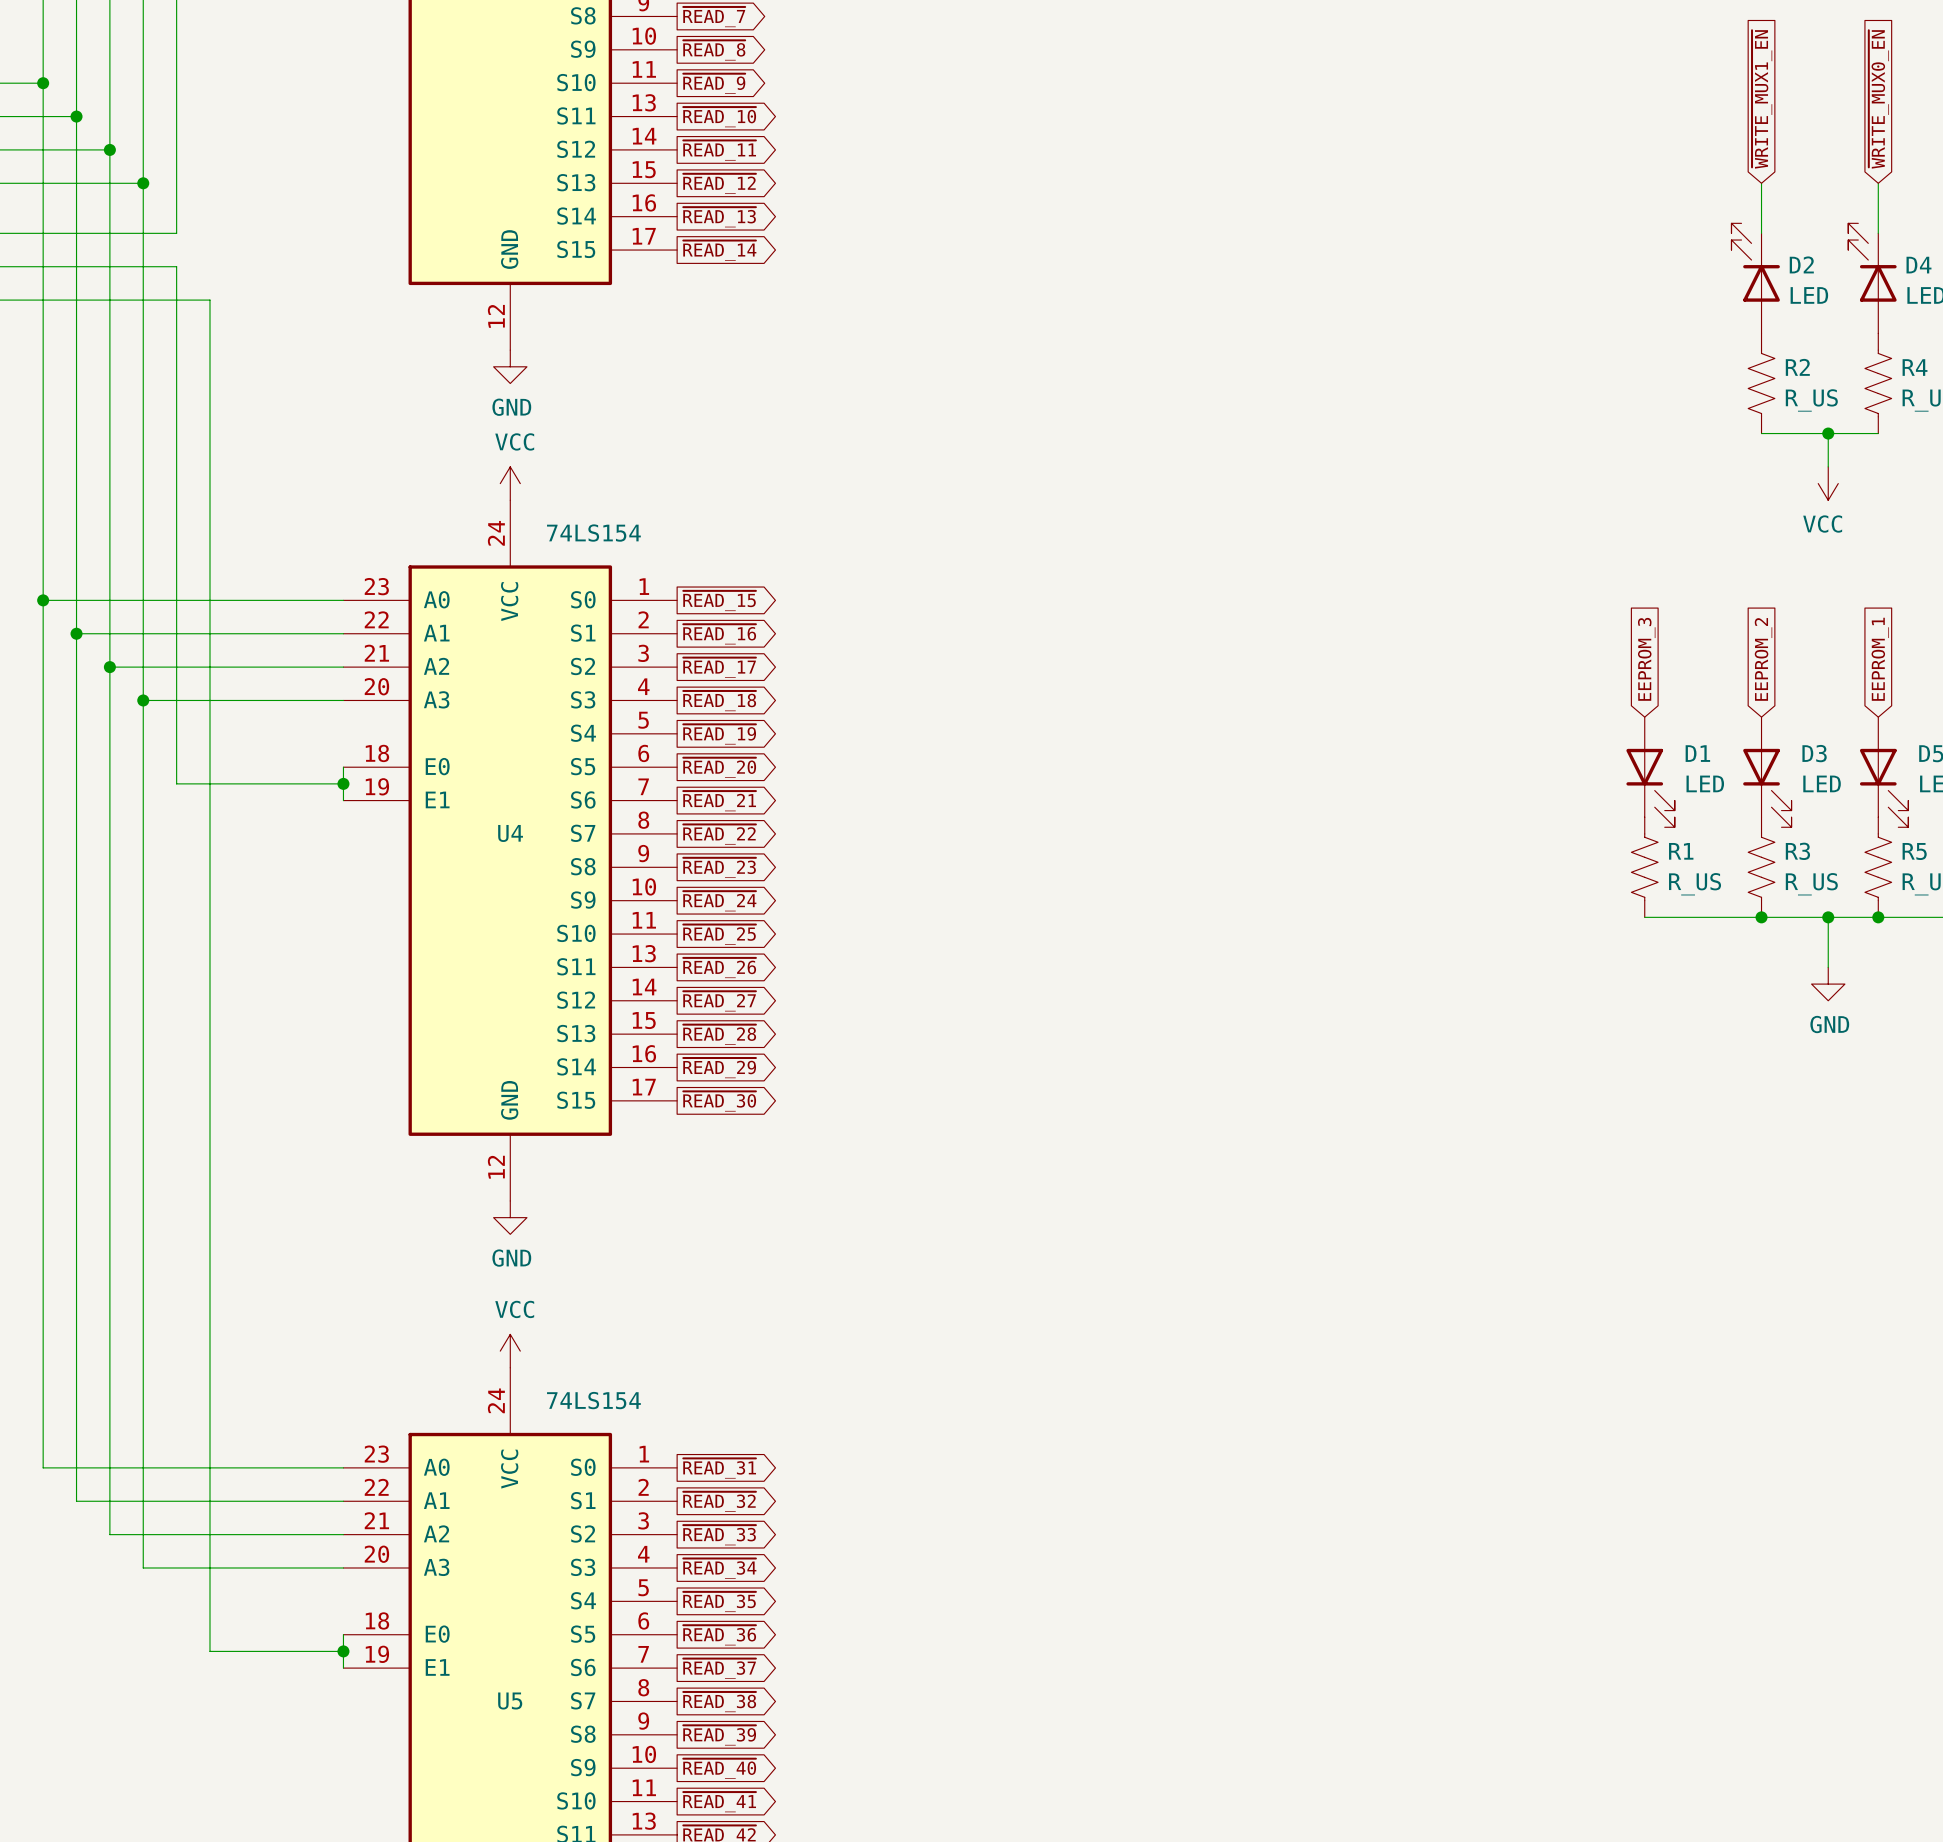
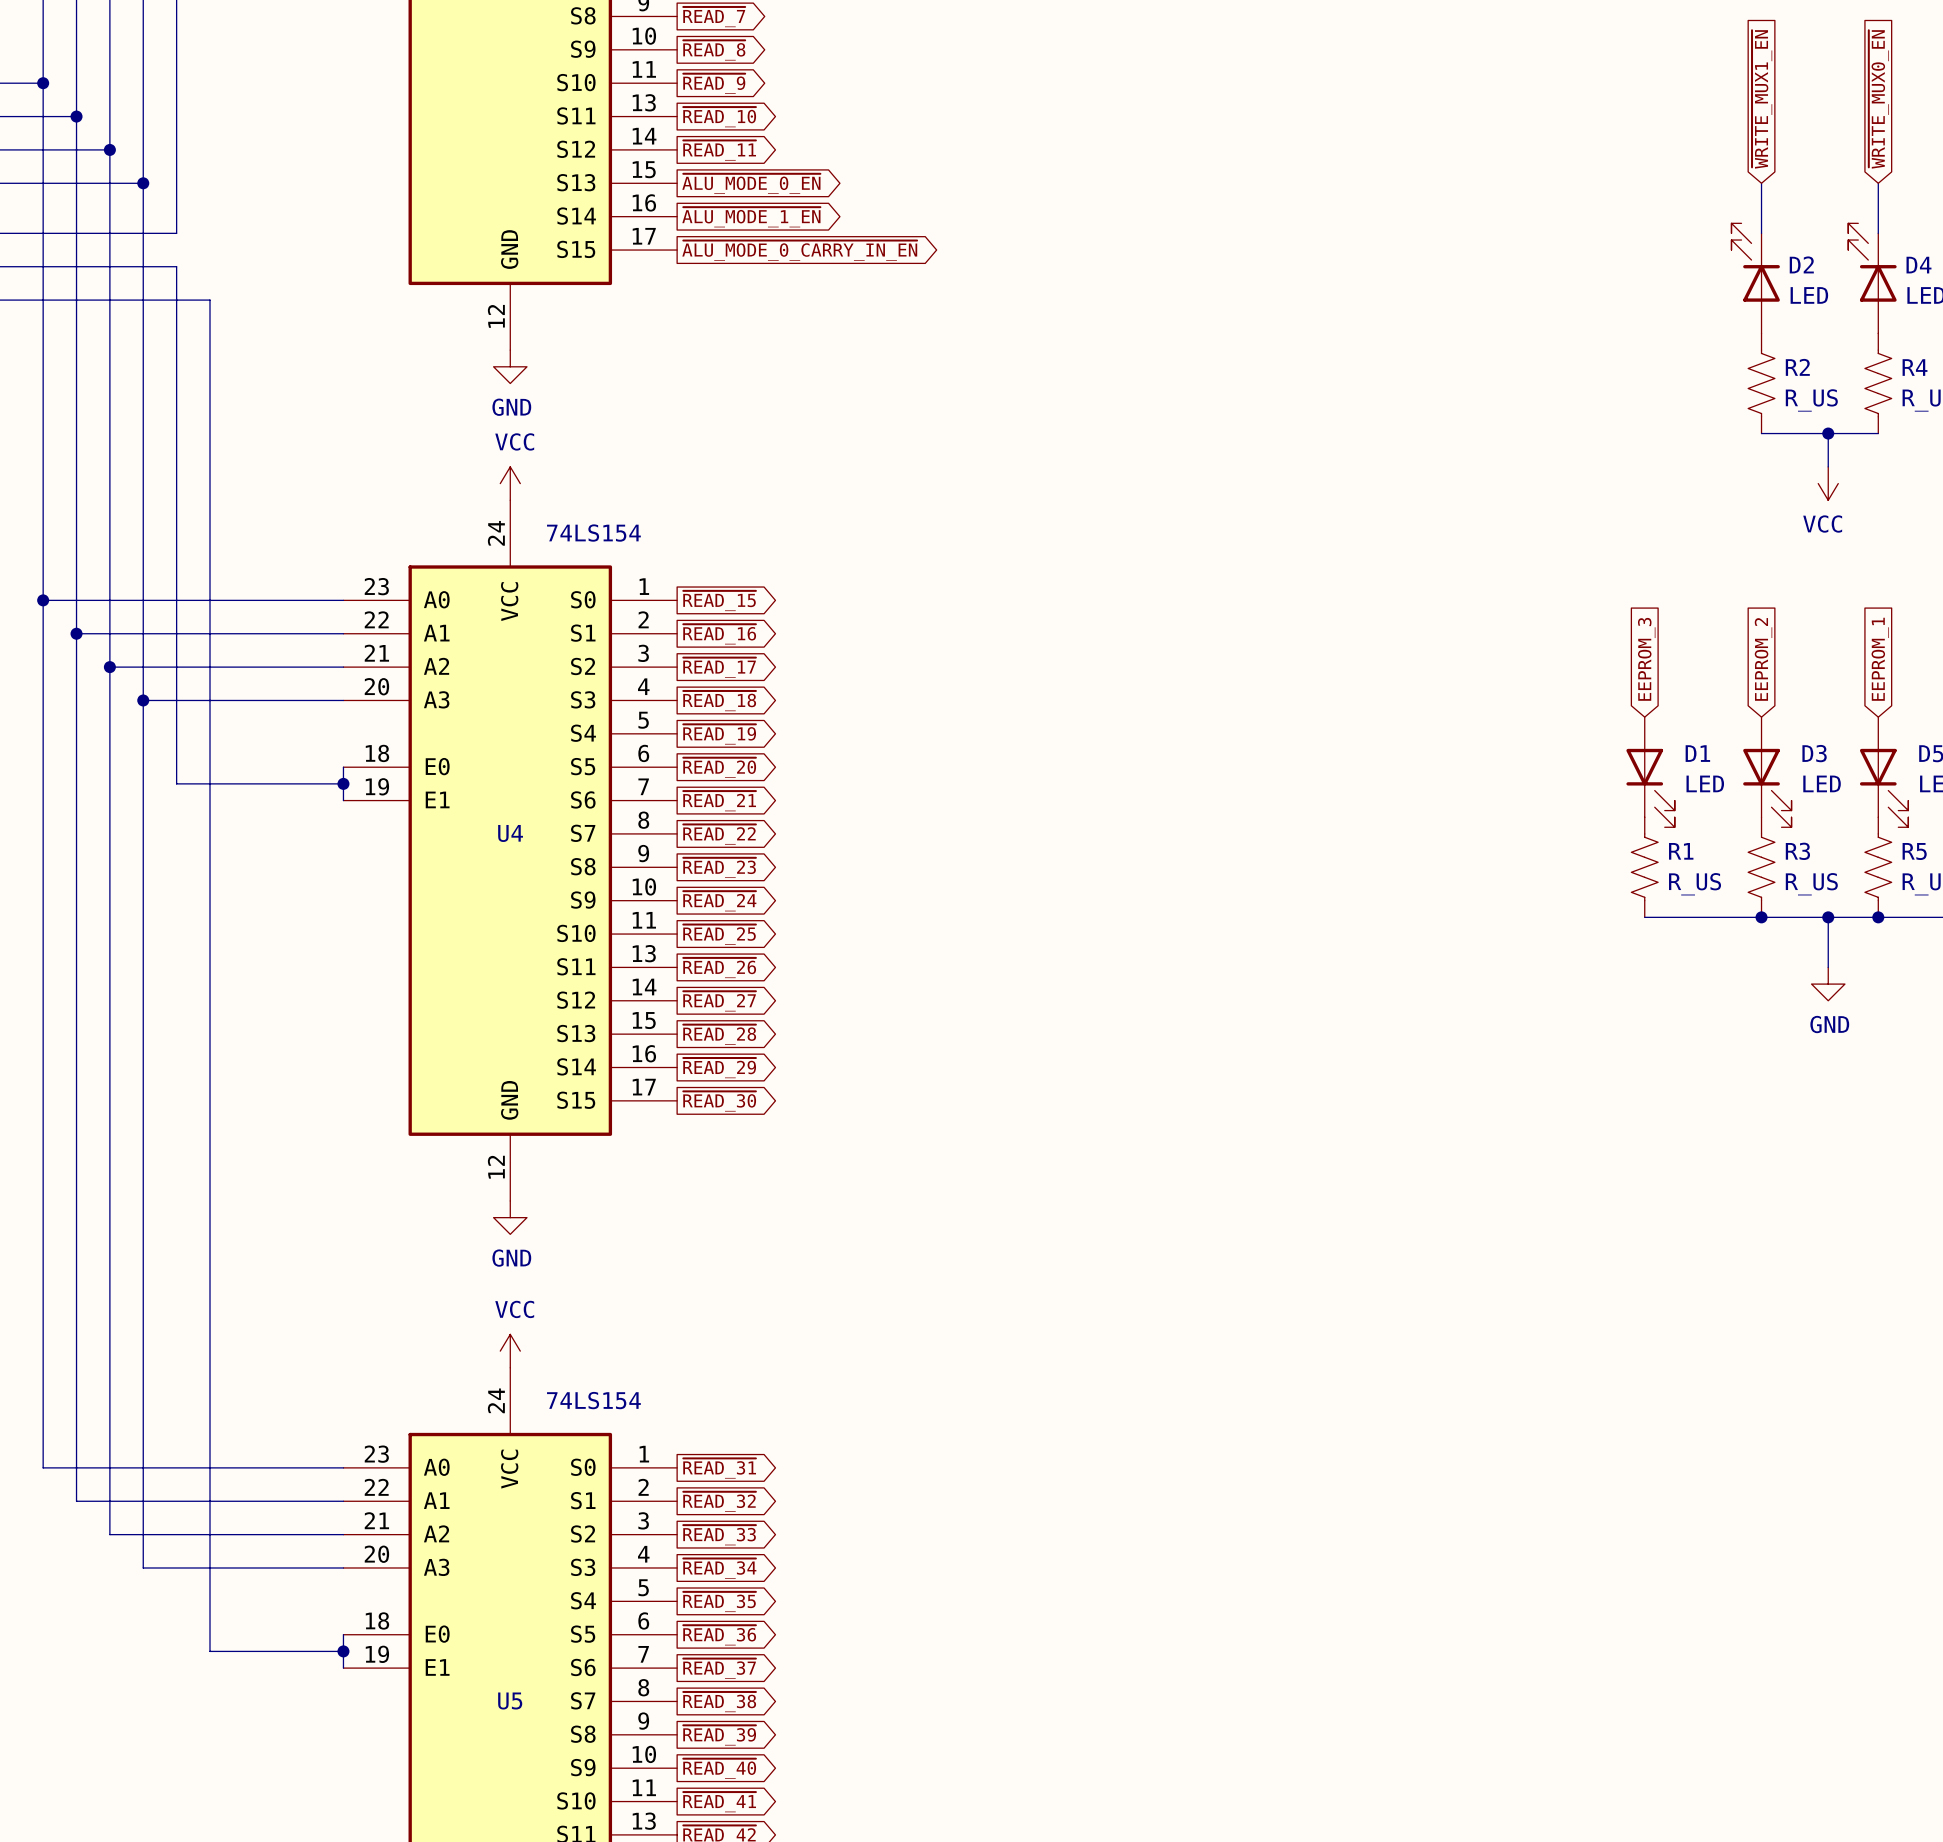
global label: ~{READ_12} (719, 183) -> ~{ALU_MODE_0_EN} (751, 183)
global label: ~{READ_13} (719, 217) -> ~{ALU_MODE_1_EN} (751, 217)
global label: ~{READ_14} (719, 250) -> ~{ALU_MODE_0_CARRY_IN_EN} (799, 250)

